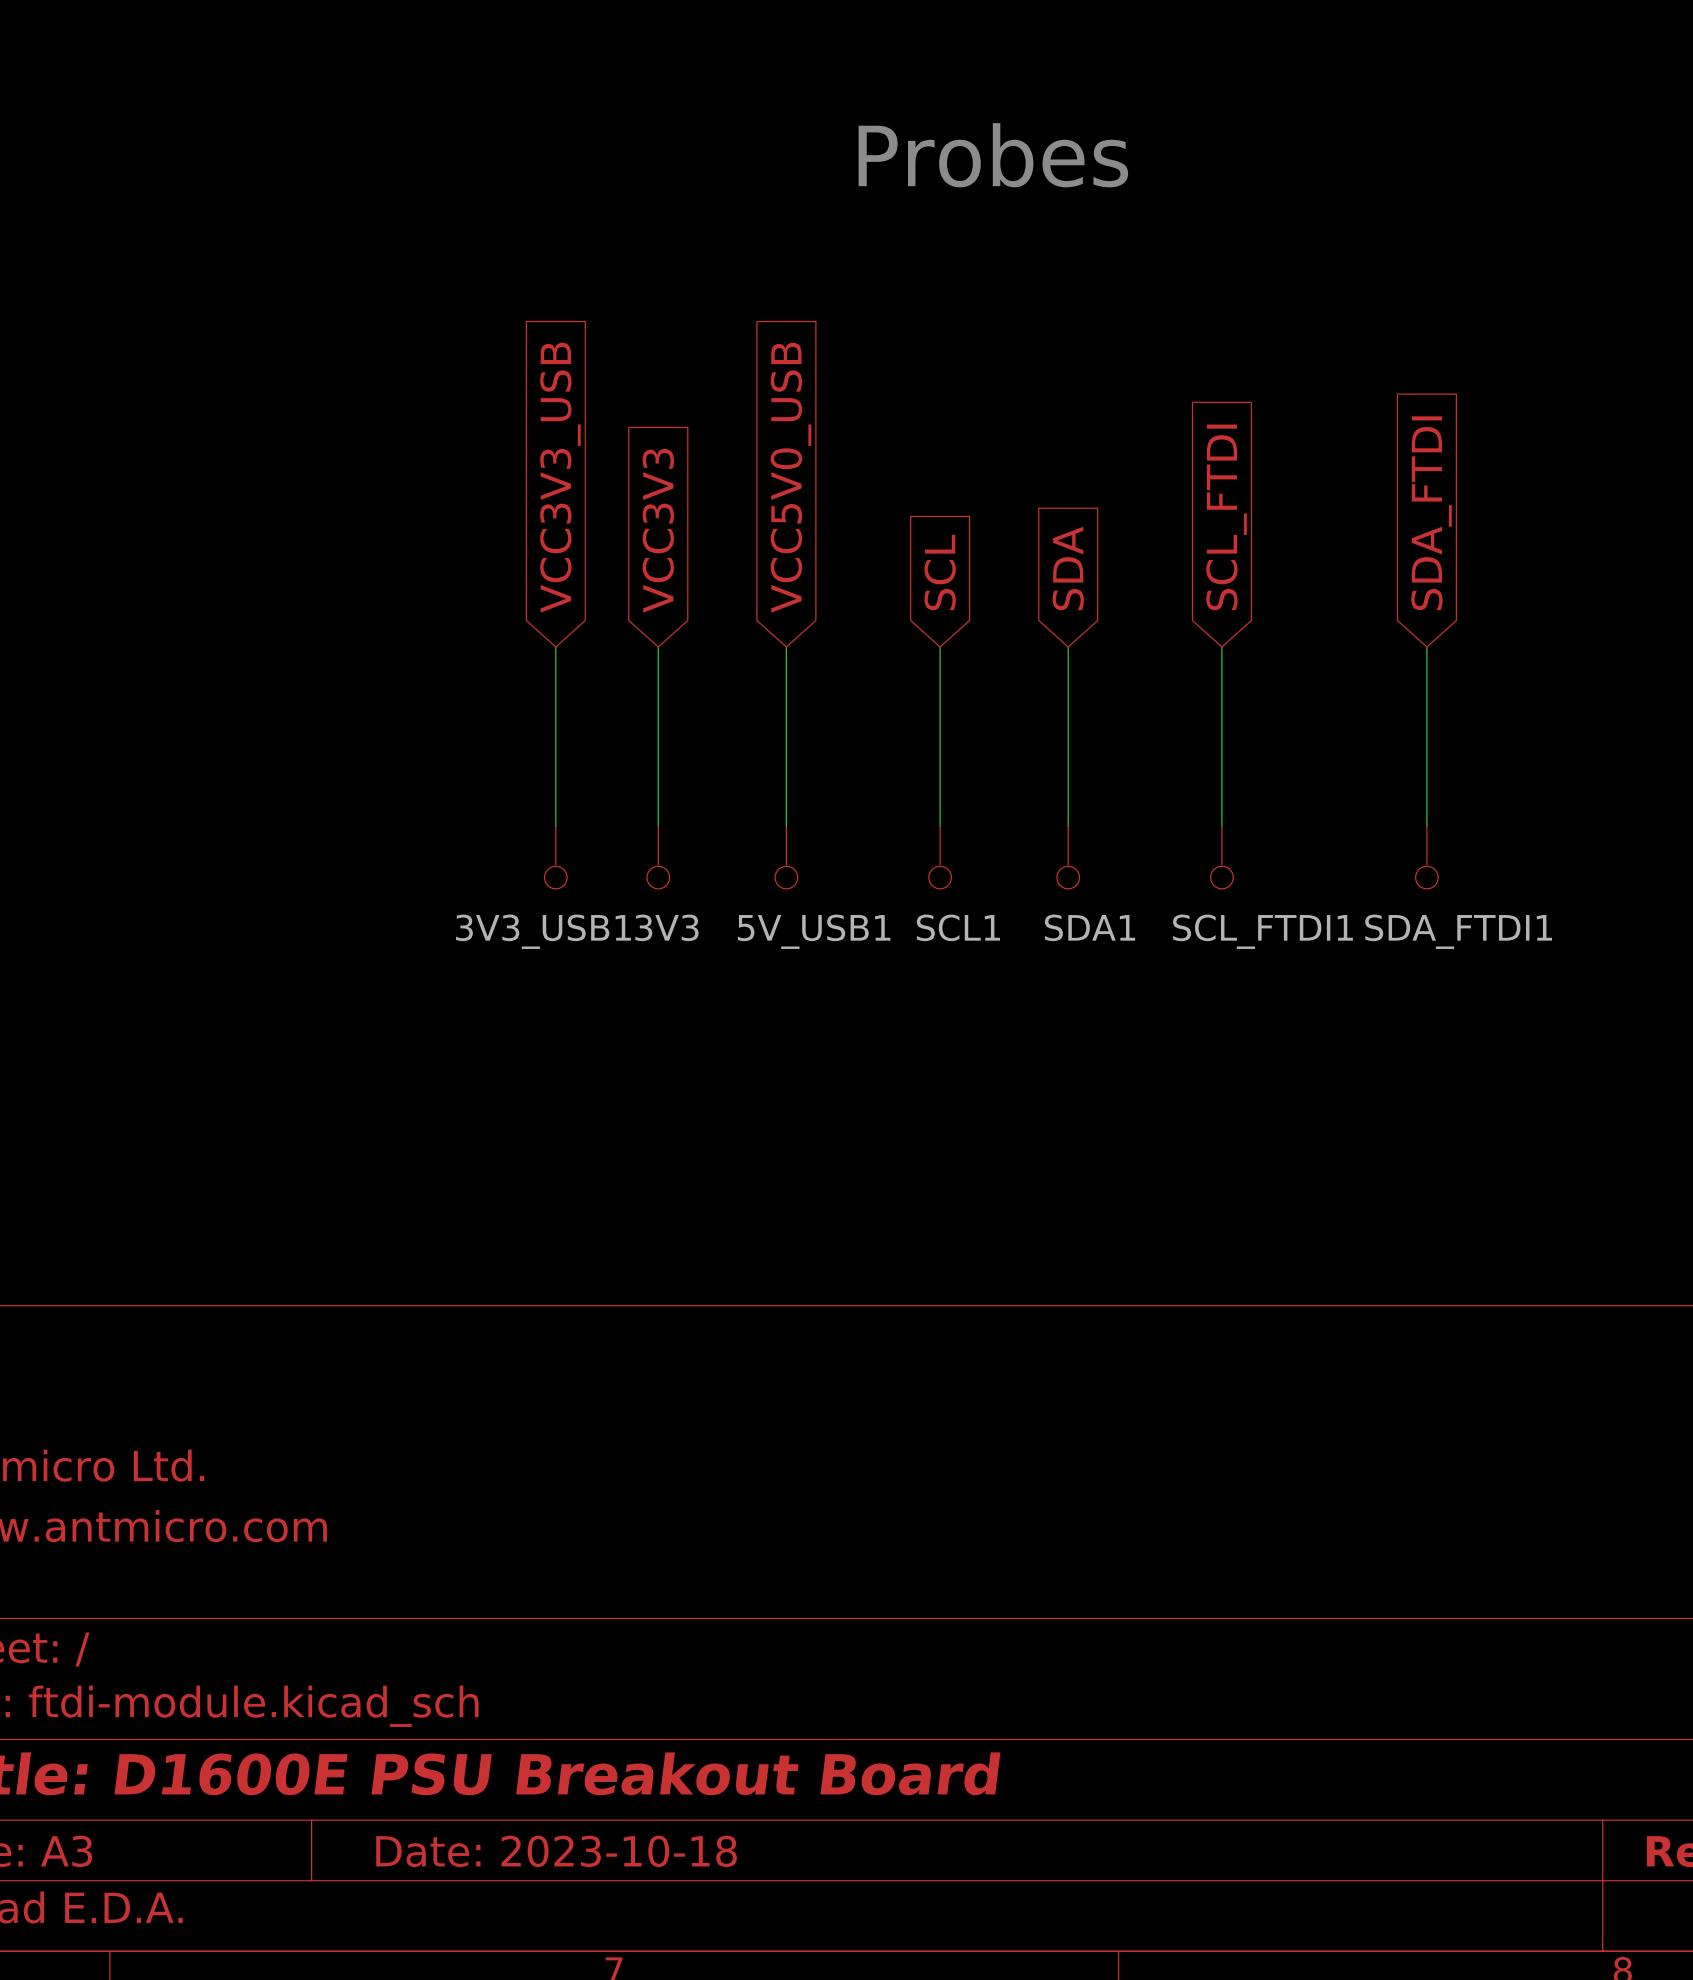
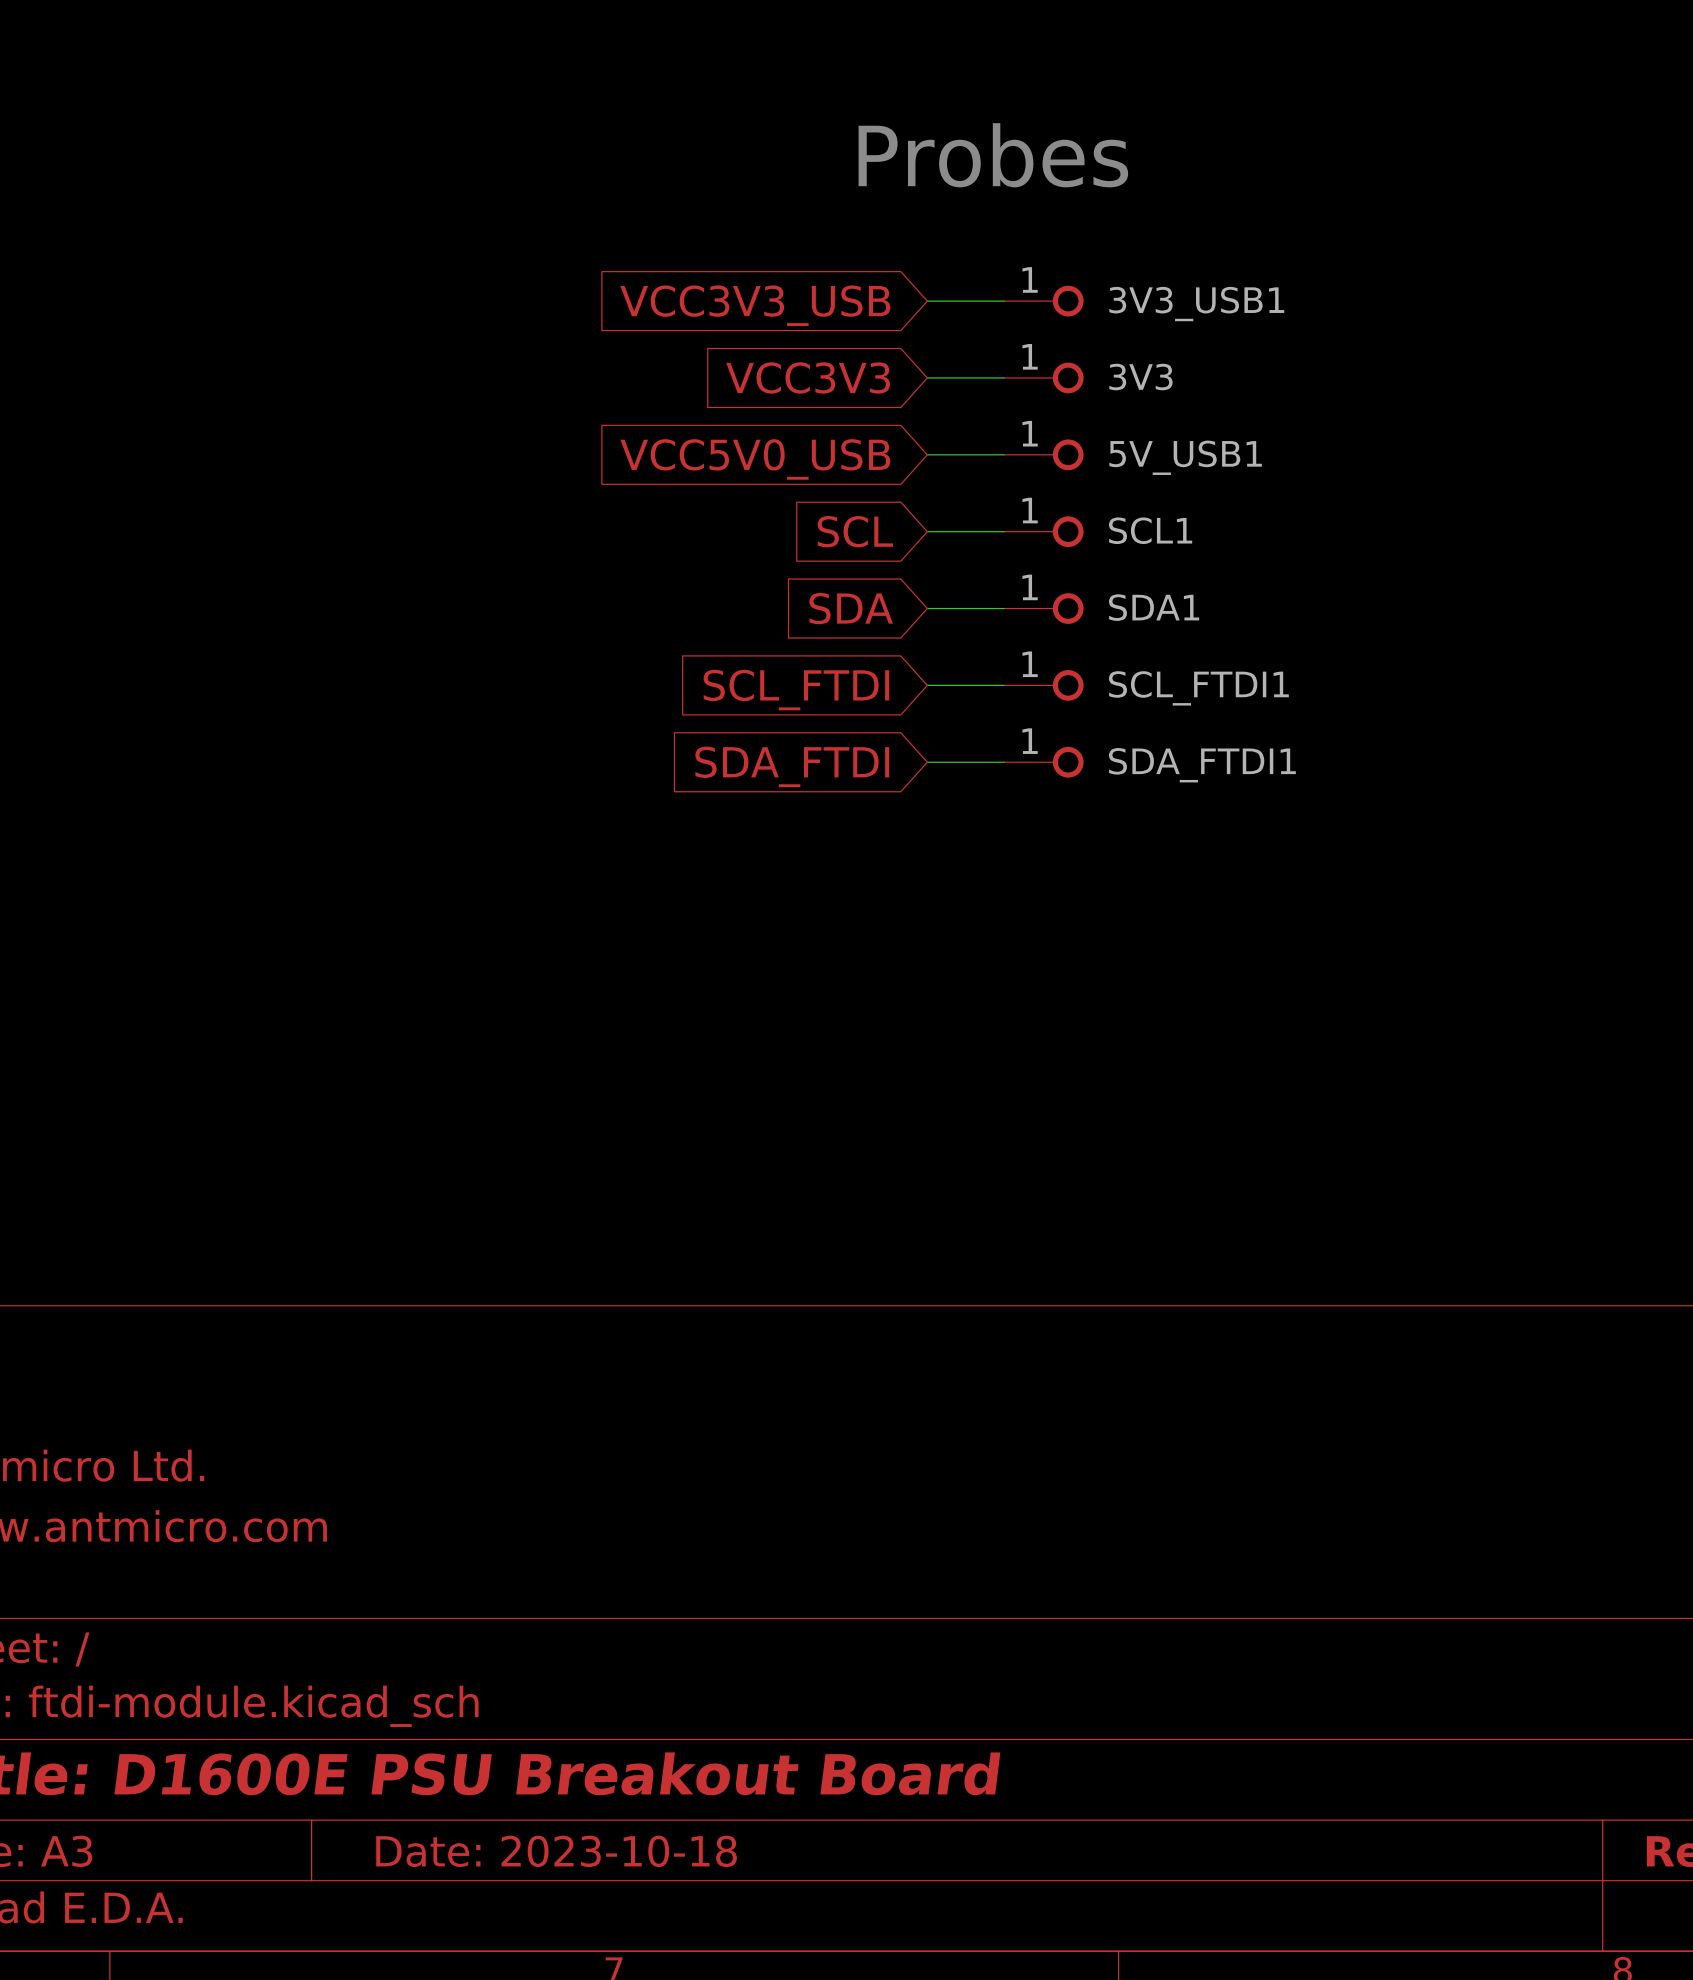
wire: none -> (927, 301) (1004, 301)
global label: none -> VCC3V3_USB (755, 305)
wire: none -> (927, 377) (1004, 377)
wire: none -> (927, 454) (1004, 454)
global label: VCC3V3_USB (560, 477) -> none
global label rotation: 0° (791, 477) -> 90° counterclockwise (755, 459)
global label: SDA_FTDI (1431, 513) -> none
global label rotation: 0° (1226, 517) -> 90° counterclockwise (796, 690)
global label position: SCL_FTDI (1226, 517) -> SCL_FTDI (796, 690)
global label rotation: 0° (658, 530) -> 90° counterclockwise (808, 377)
wire: none -> (927, 531) (1004, 531)
global label rotation: 0° (1068, 568) -> 90° counterclockwise (851, 608)
global label position: SDA (1068, 568) -> SDA (851, 608)
global label rotation: 0° (940, 572) -> 90° counterclockwise (855, 531)
wire: none -> (927, 608) (1004, 608)
wire: (555, 646) (555, 826) -> none
wire: (658, 646) (658, 826) -> none
wire: (786, 646) (786, 826) -> none
wire: (940, 646) (940, 826) -> none
wire: (1068, 646) (1068, 826) -> none
wire: (1221, 646) (1221, 826) -> none
wire: (1426, 646) (1426, 826) -> none
wire: none -> (927, 685) (1004, 685)
wire: none -> (927, 762) (1004, 762)
global label: none -> SDA_FTDI (792, 766)
3V3_USB1 symbol: [544, 826, 568, 889] -> [1004, 285, 1084, 317]
3V3 symbol: [647, 826, 670, 889] -> [1004, 362, 1084, 394]
5V_USB1 symbol: [775, 826, 798, 889] -> [1004, 439, 1084, 471]
SCL1 symbol: [928, 826, 952, 889] -> [1004, 516, 1084, 548]
SDA1 symbol: [1056, 826, 1080, 889] -> [1004, 593, 1084, 624]
SCL_FTDI1 symbol: [1210, 826, 1234, 889] -> [1004, 670, 1084, 701]
SDA_FTDI1 symbol: [1415, 826, 1439, 889] -> [1004, 746, 1084, 778]
3V3 name position: 3V3 (666, 927) -> 3V3 (1140, 377)
SCL1 name position: SCL1 (958, 927) -> SCL1 (1150, 530)
SDA1 name position: SDA1 (1090, 927) -> SDA1 (1154, 607)
3V3_USB1 name position: 3V3_USB1 (543, 931) -> 3V3_USB1 (1196, 304)
5V_USB1 name position: 5V_USB1 (814, 931) -> 5V_USB1 (1185, 457)
SCL_FTDI1 name position: SCL_FTDI1 (1262, 931) -> SCL_FTDI1 (1198, 688)
SDA_FTDI1 name position: SDA_FTDI1 (1458, 931) -> SDA_FTDI1 (1202, 765)

